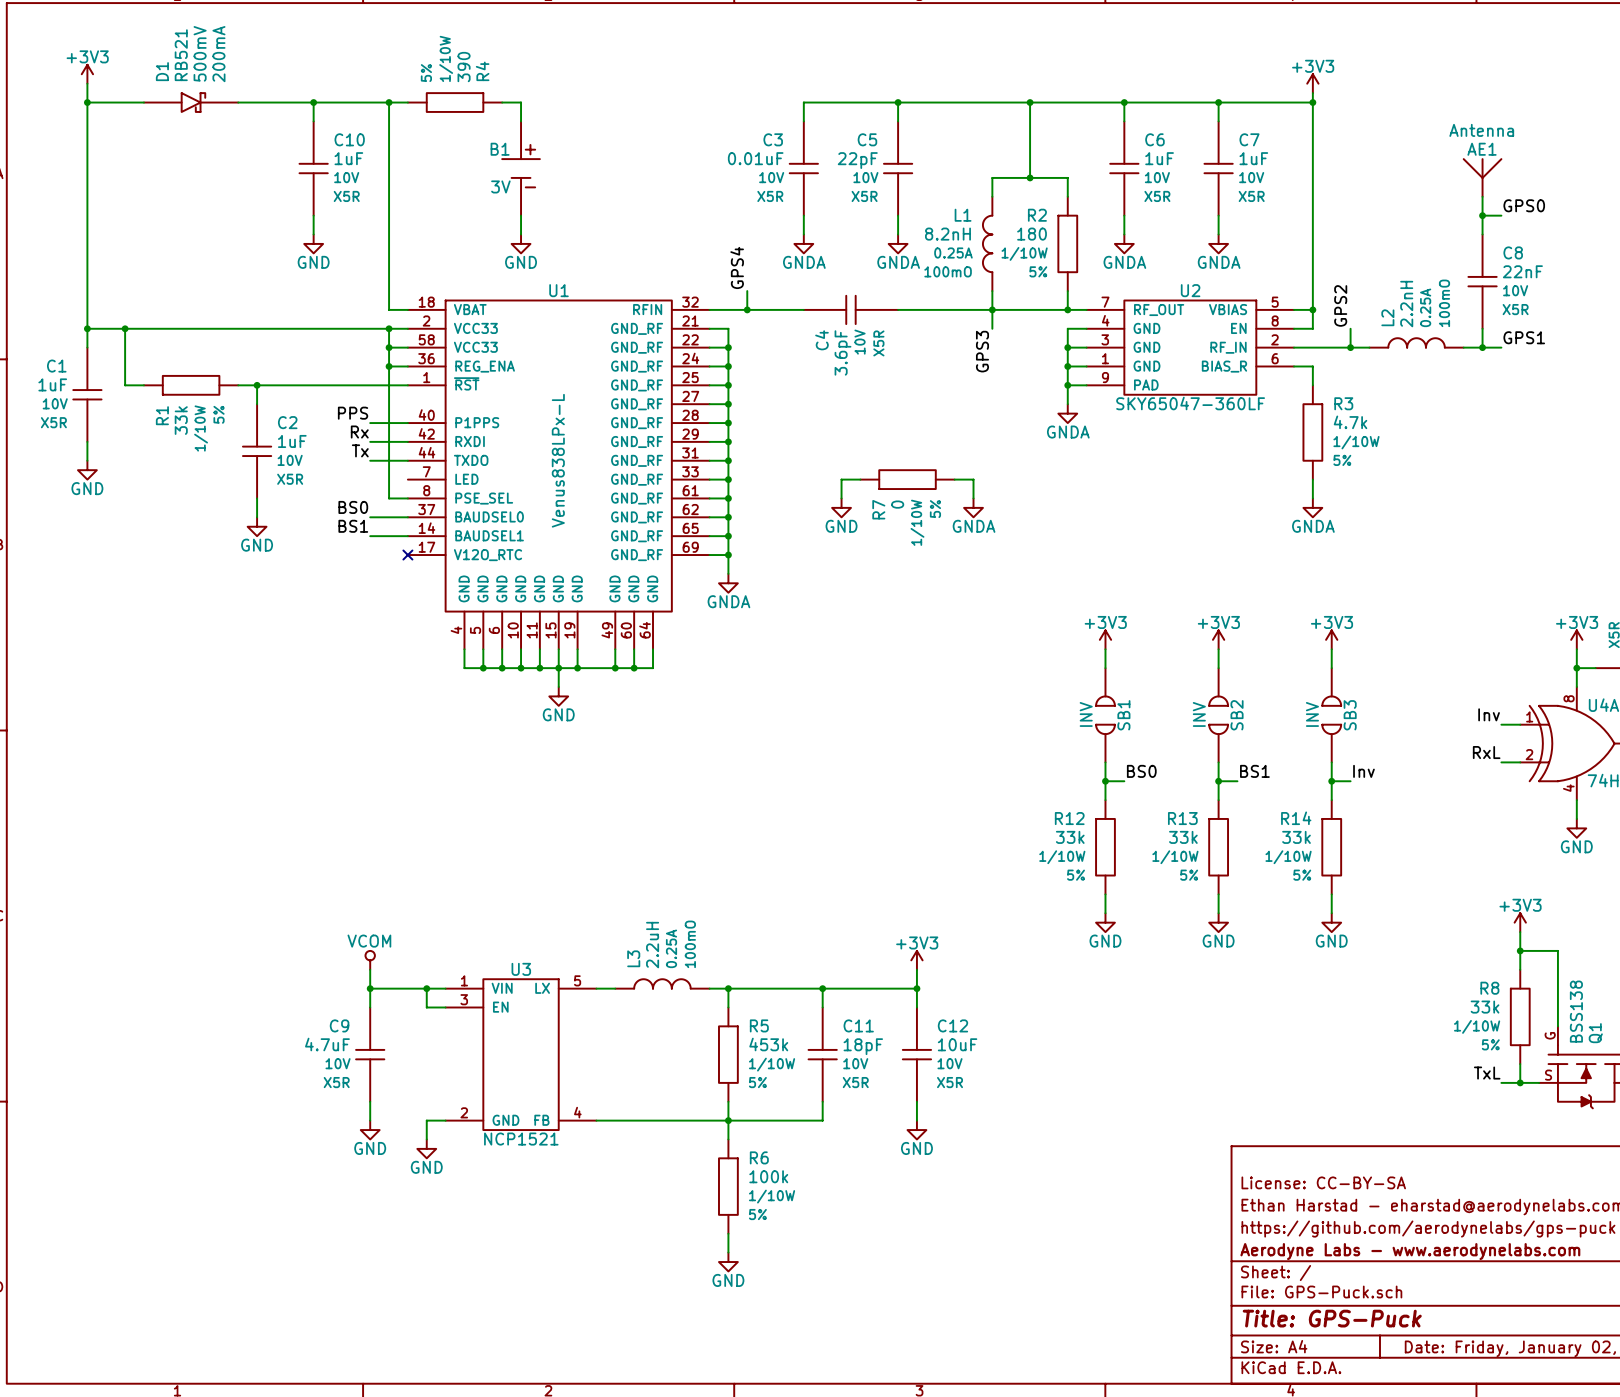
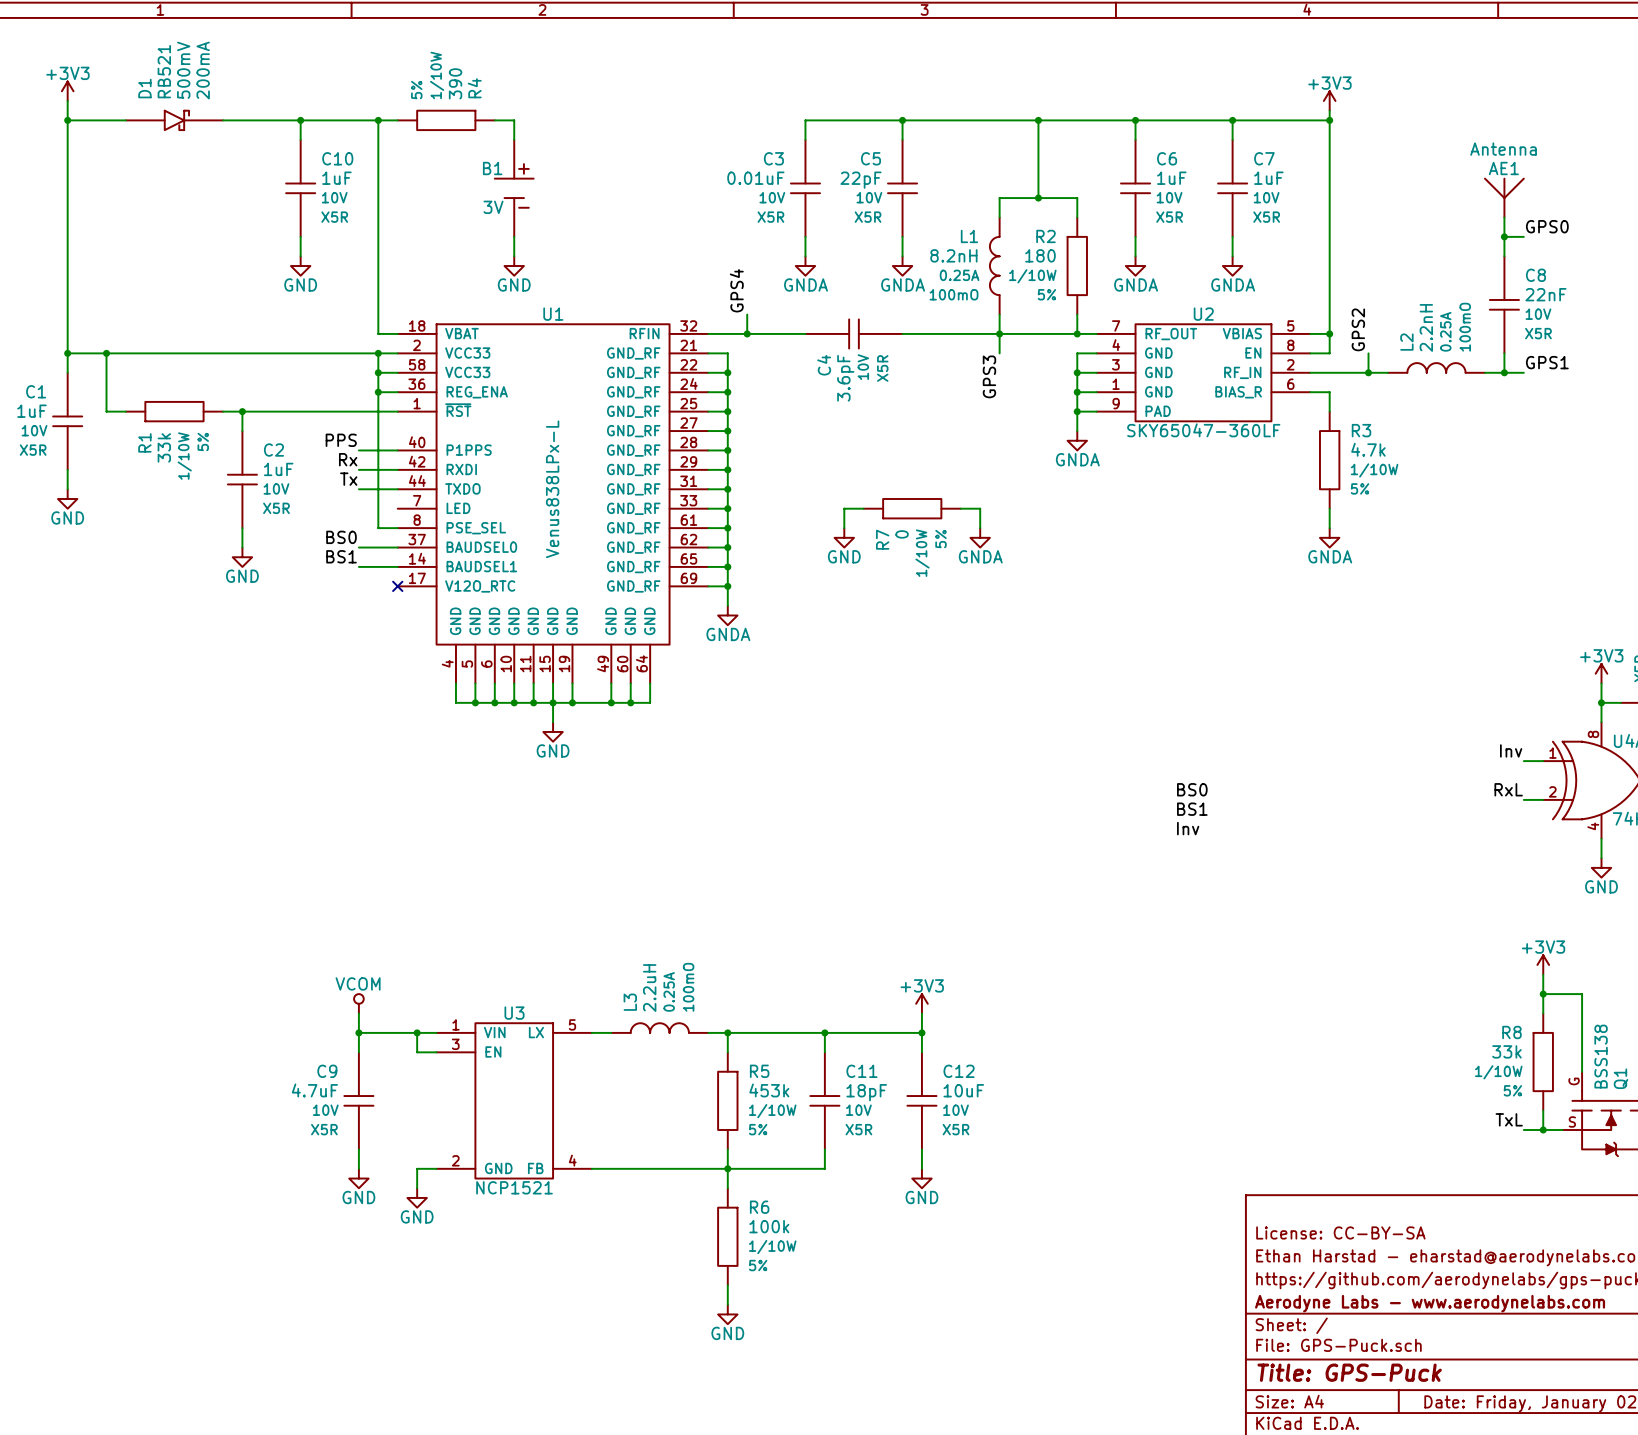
power symbol: +3V3 (1105, 639) -> none
power symbol: +3V3 (1218, 639) -> none
power symbol: +3V3 (1331, 639) -> none
wire: (1105, 649) (1105, 668) -> none
wire: (1218, 649) (1218, 668) -> none
wire: (1331, 649) (1331, 668) -> none
SB1: INV (1105, 715) -> none
SB2: INV (1218, 715) -> none
SB3: INV (1331, 715) -> none
wire: (1105, 762) (1105, 800) -> none
wire: (1218, 762) (1218, 800) -> none
wire: (1331, 762) (1331, 800) -> none
label position: BS0 (1141, 771) -> BS0 (1192, 789)
label position: BS1 (1254, 771) -> BS1 (1192, 809)
label: Inv (1363, 771) -> none
wire: (1105, 781) (1124, 781) -> none
junction: (1105, 781) -> none
wire: (1218, 781) (1237, 781) -> none
junction: (1218, 781) -> none
wire: (1331, 781) (1350, 781) -> none
junction: (1331, 781) -> none
label: none -> Inv (1188, 828)
R12: 33k (1105, 847) -> none
R13: 33k (1218, 847) -> none
R14: 33k (1331, 847) -> none
wire: (1105, 894) (1105, 913) -> none
wire: (1218, 894) (1218, 913) -> none
wire: (1331, 894) (1331, 913) -> none
power symbol: GND (1105, 922) -> none
power symbol: GND (1218, 922) -> none
power symbol: GND (1331, 922) -> none

